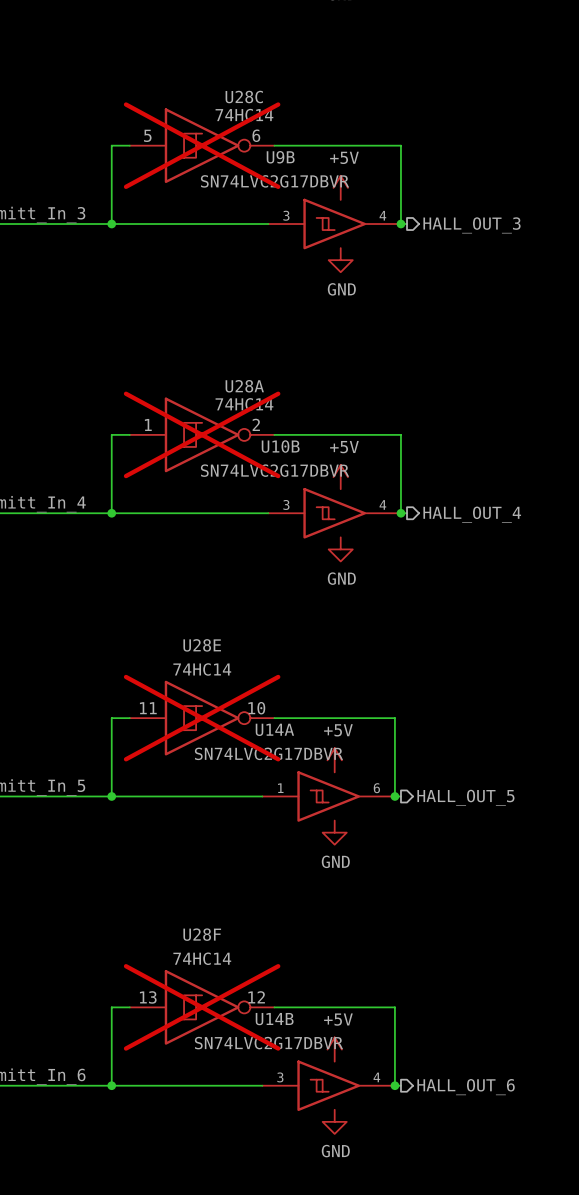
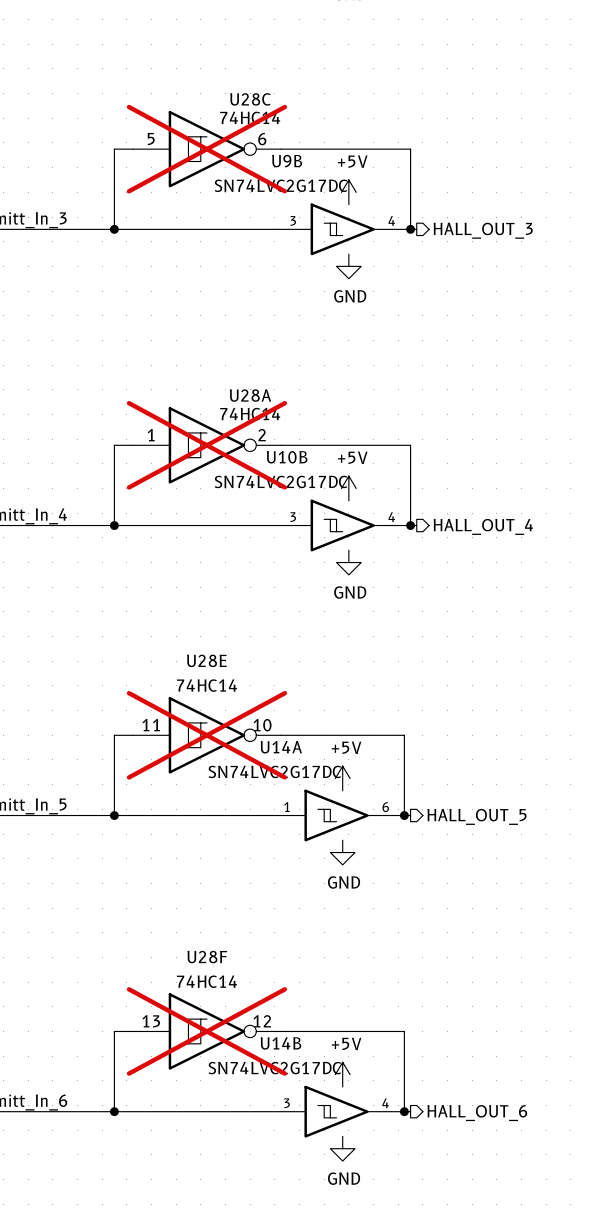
U9B value: SN74LVC2G17DBVR (274, 181) -> SN74LVC2G17DC (281, 185)
U10B value: SN74LVC2G17DBVR (274, 470) -> SN74LVC2G17DC (281, 481)
U14A value: SN74LVC2G17DBVR (268, 753) -> SN74LVC2G17DC (274, 771)
U14B value: SN74LVC2G17DBVR (268, 1043) -> SN74LVC2G17DC (274, 1068)

